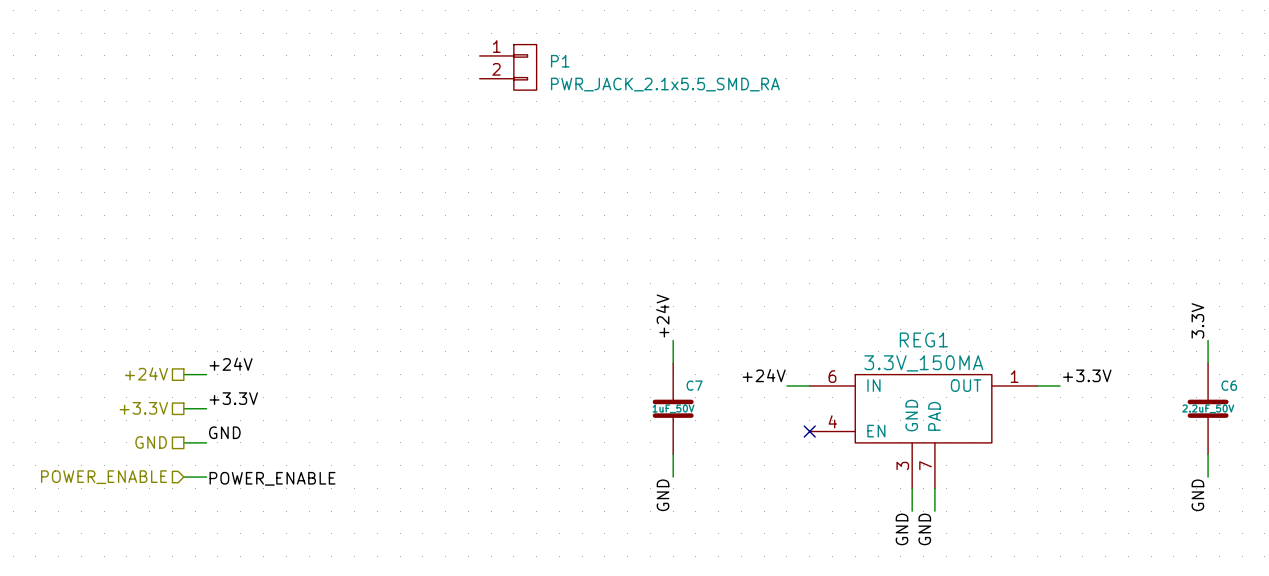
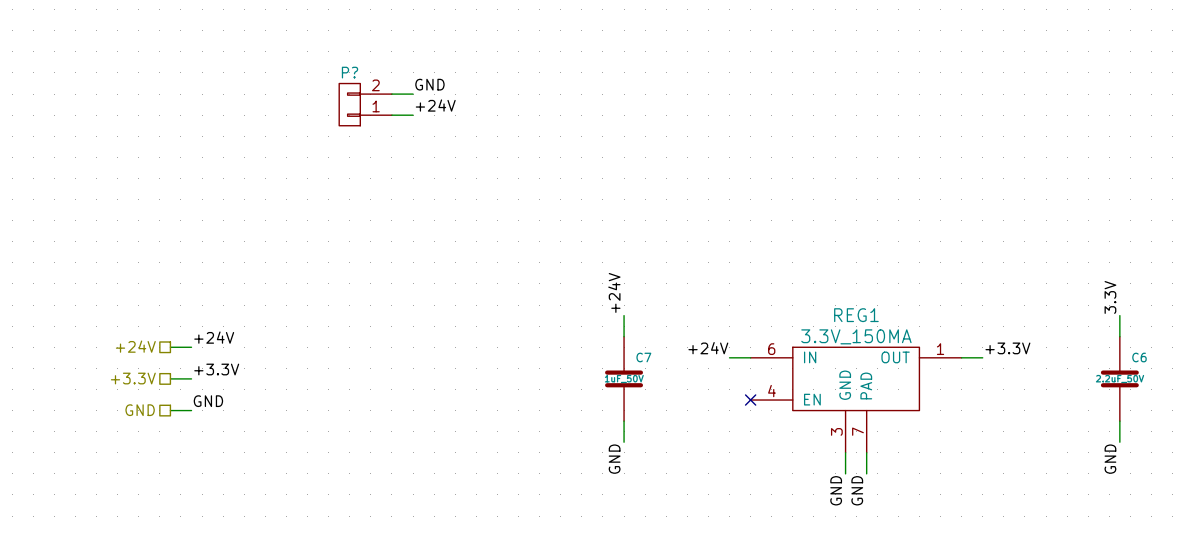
P1: PWR_JACK_2.1x5.5_SMD_RA (508, 67) -> none
label: none -> GND (429, 84)
wire: none -> (391, 94) (413, 94)
P?: none -> (365, 104)
label: none -> +24V (435, 105)
wire: none -> (391, 115) (413, 115)
hierarchical label: POWER_ENABLE (103, 477) -> none
wire: (183, 477) (206, 477) -> none
label: POWER_ENABLE (272, 478) -> none

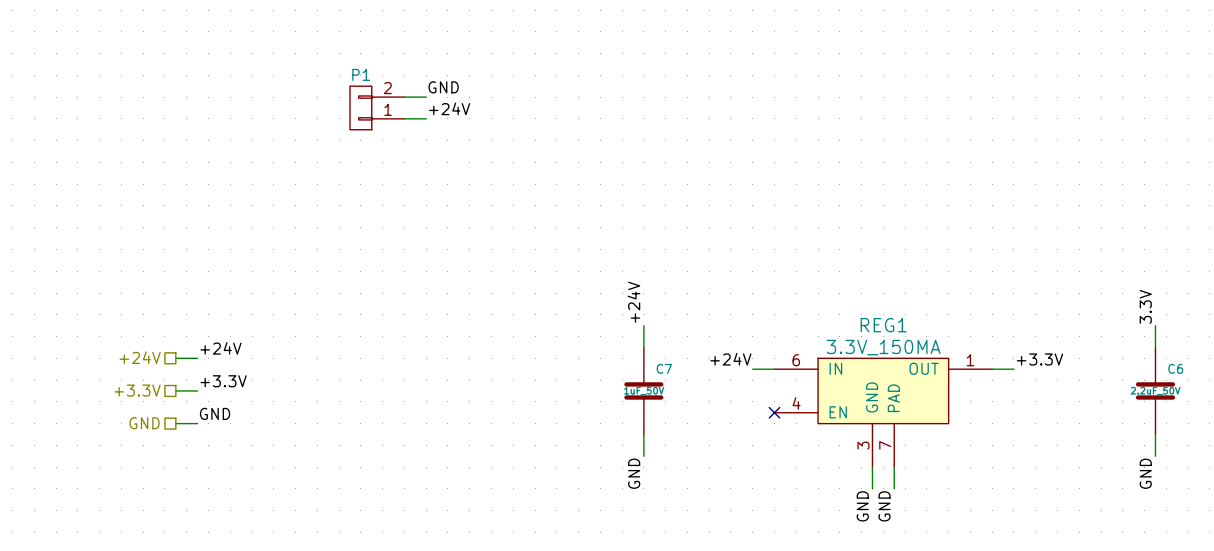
P? name: P? (350, 72) -> P1 (361, 74)
REG1 symbol: [750, 347, 962, 453] -> [774, 358, 993, 468]

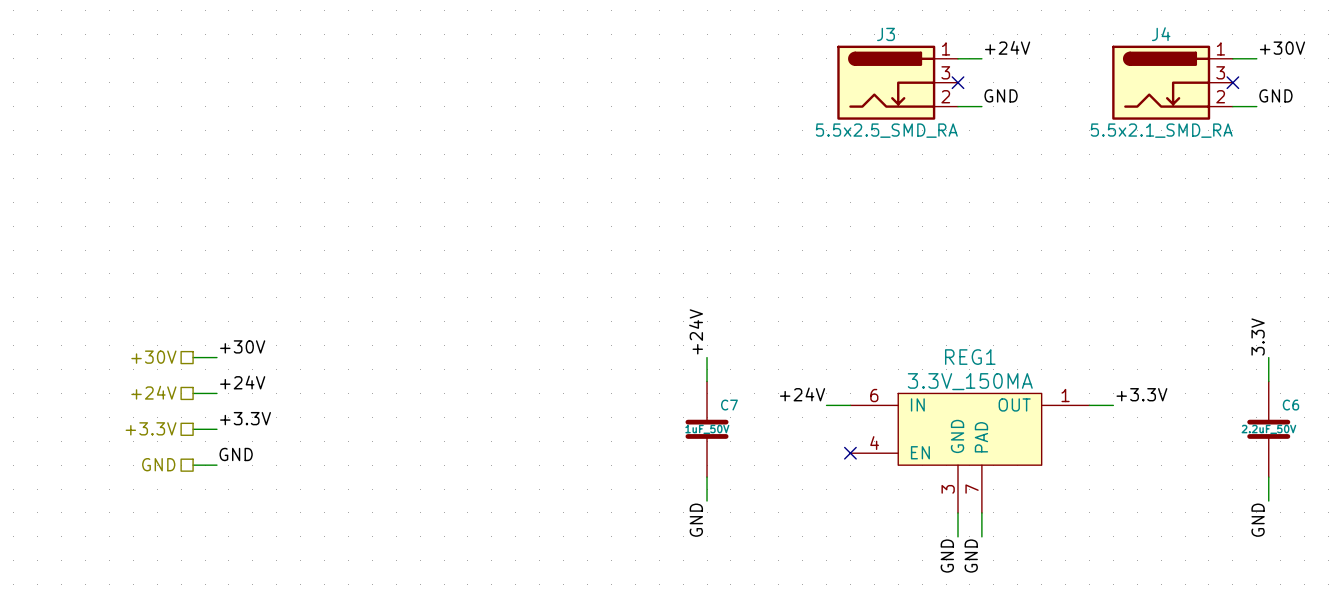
label: none -> +24V (1007, 47)
label: none -> +30V (1282, 48)
wire: none -> (958, 58) (981, 58)
wire: none -> (1232, 58) (1256, 58)
J3: none -> 5.5x2.5_SMD_RA (897, 82)
no-connect mark: none -> (958, 82)
J4: none -> 5.5x2.1_SMD_RA (1172, 82)
no-connect mark: none -> (1232, 82)
label: GND (443, 87) -> none
label: none -> GND (1001, 95)
label: none -> GND (1275, 95)
wire: (404, 97) (426, 97) -> none
wire: none -> (958, 106) (981, 106)
wire: none -> (1232, 106) (1256, 106)
P1: (377, 107) -> none
label: +24V (449, 108) -> none
wire: (404, 118) (426, 118) -> none
label: none -> +30V (242, 346)
hierarchical label: none -> +30V (153, 357)
wire: none -> (193, 357) (216, 357)

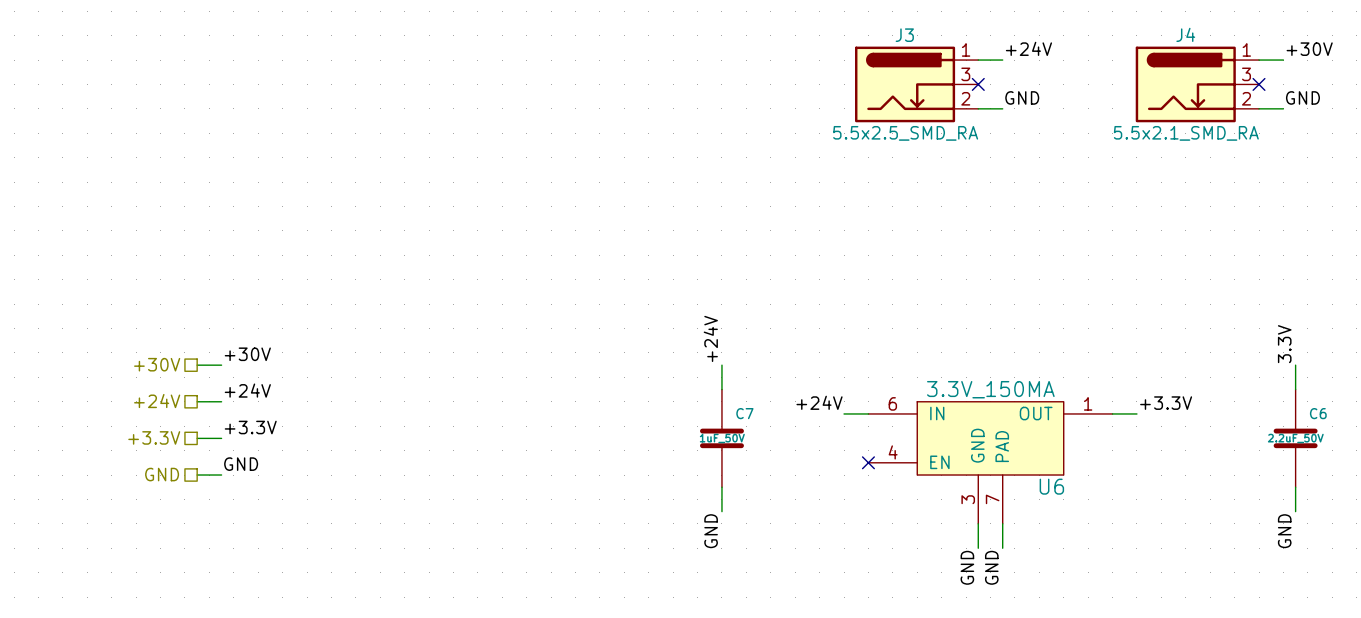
REG1 name: REG1 (970, 357) -> U6 (1051, 486)

